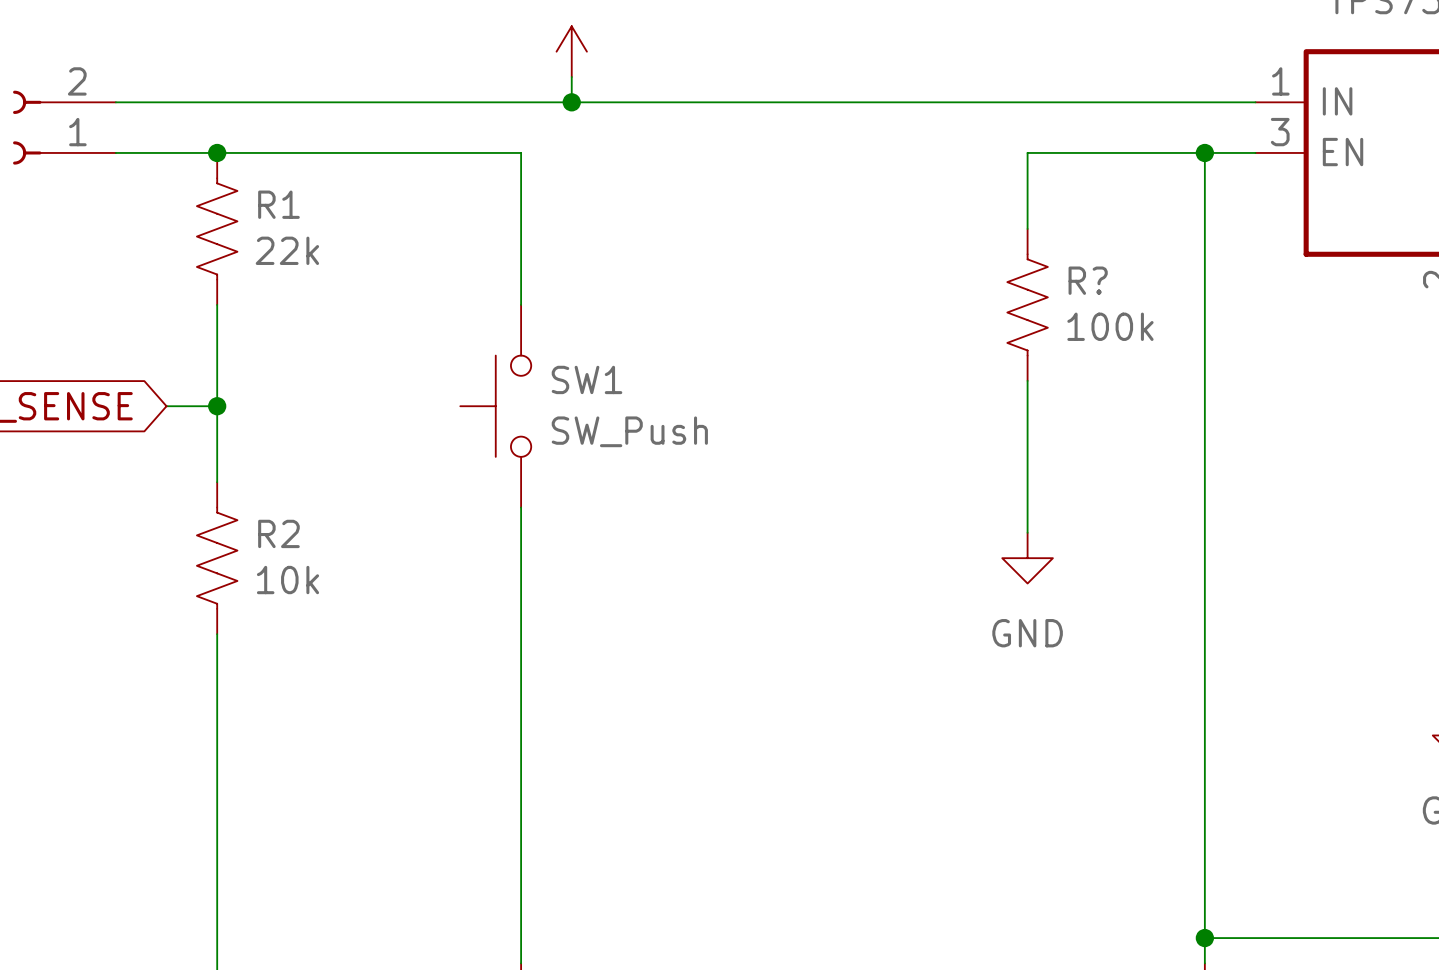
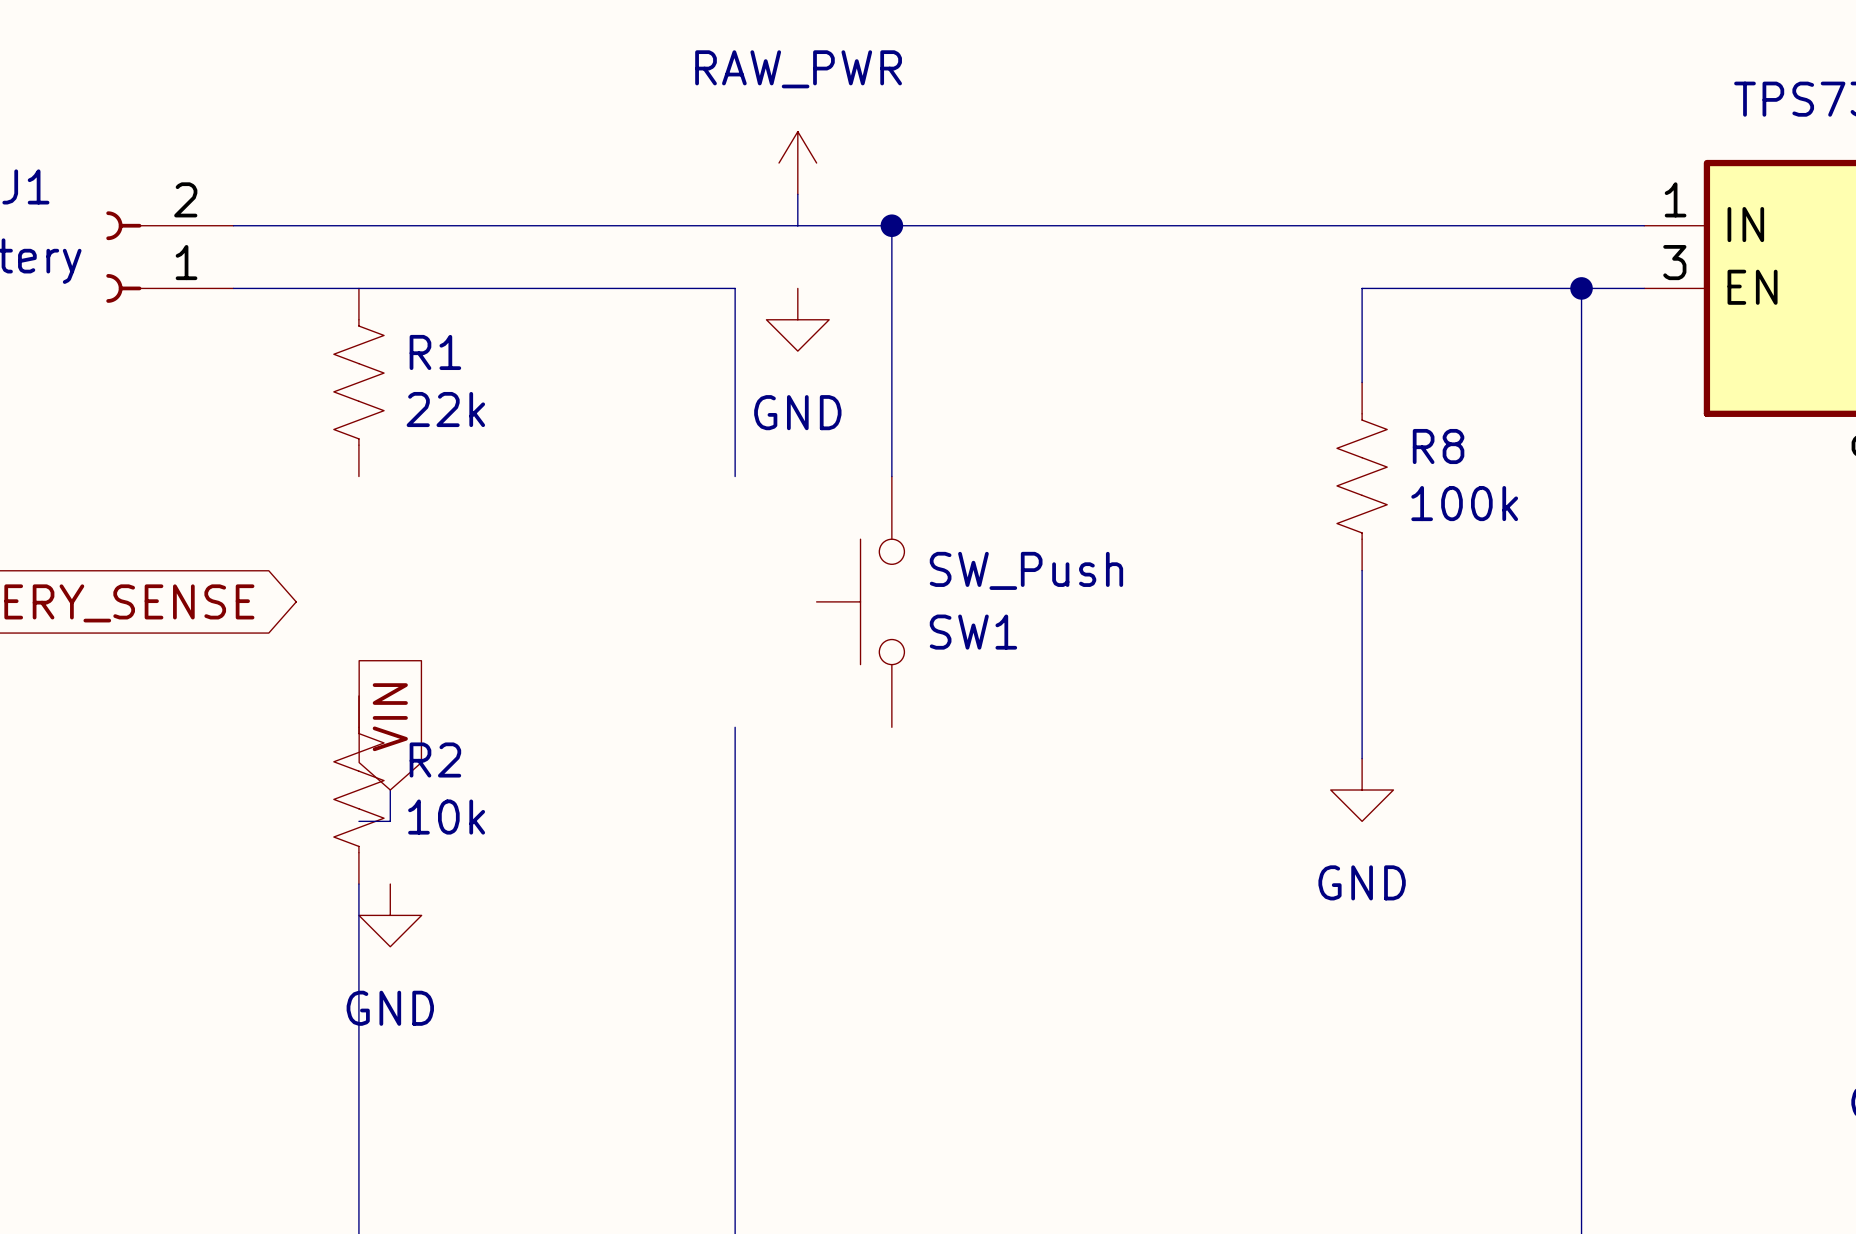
junction position: (571, 102) -> (891, 225)
wire: none -> (891, 225) (891, 476)
junction: (217, 152) -> none
power symbol: none -> GND (797, 319)
R? name: R? (1088, 280) -> R8 (1438, 446)
wire: (217, 304) (217, 482) -> none
SW1 name position: SW1 (587, 379) -> SW1 (973, 632)
wire: (166, 406) (217, 406) -> none
junction: (217, 406) -> none
SW1 position: (495, 406) -> (860, 601)
SW1 value position: SW_Push (629, 431) -> SW_Push (1026, 570)
global label: none -> VIN (390, 717)
wire: none -> (390, 790) (390, 821) (358, 821)
power symbol: none -> GND (390, 915)

